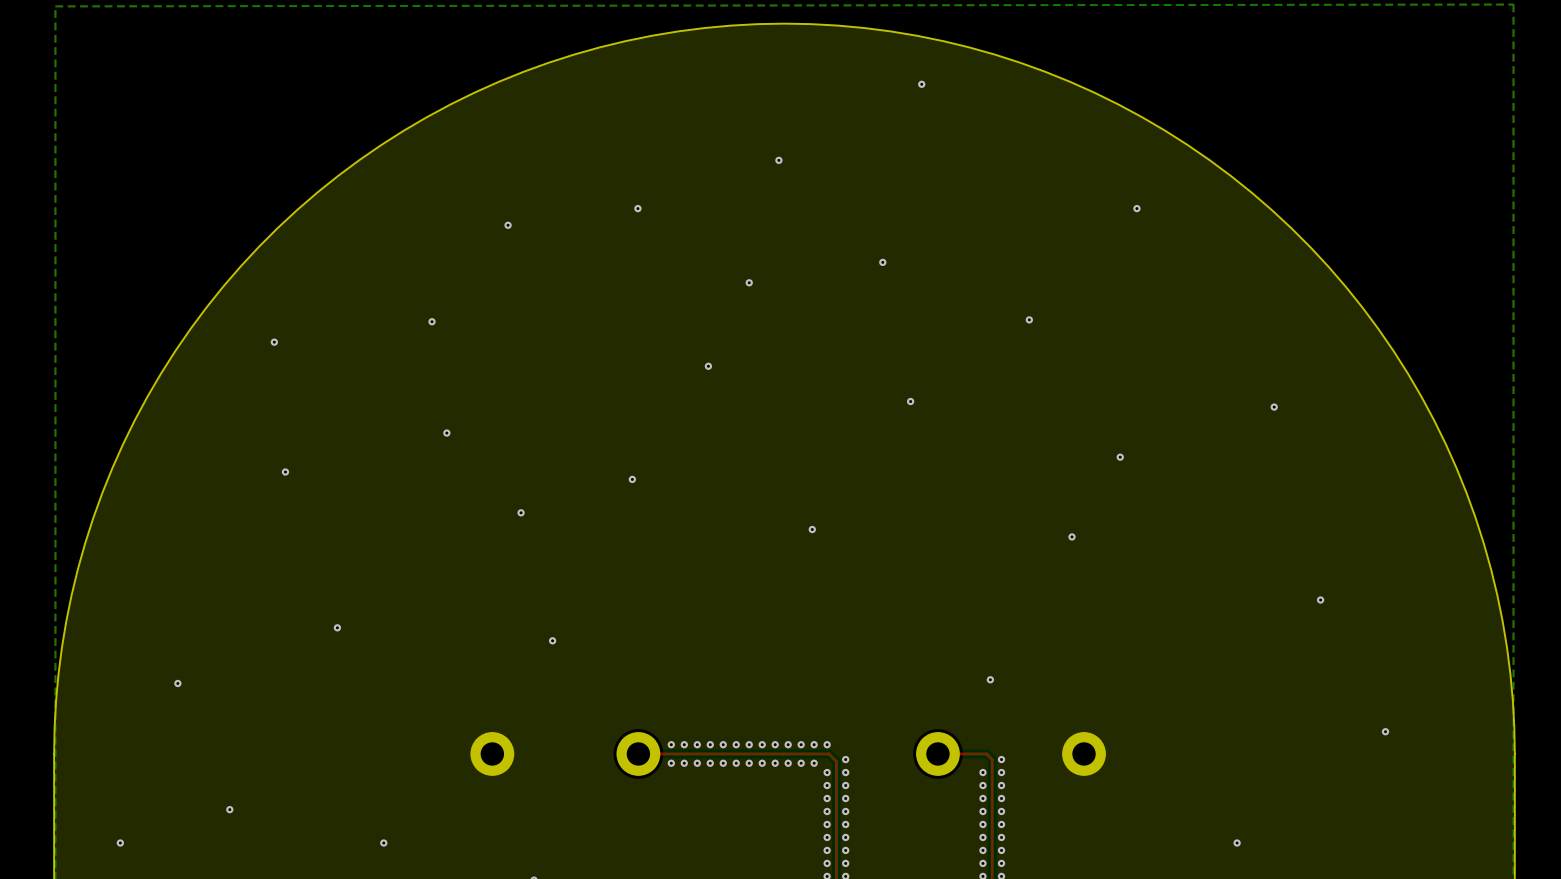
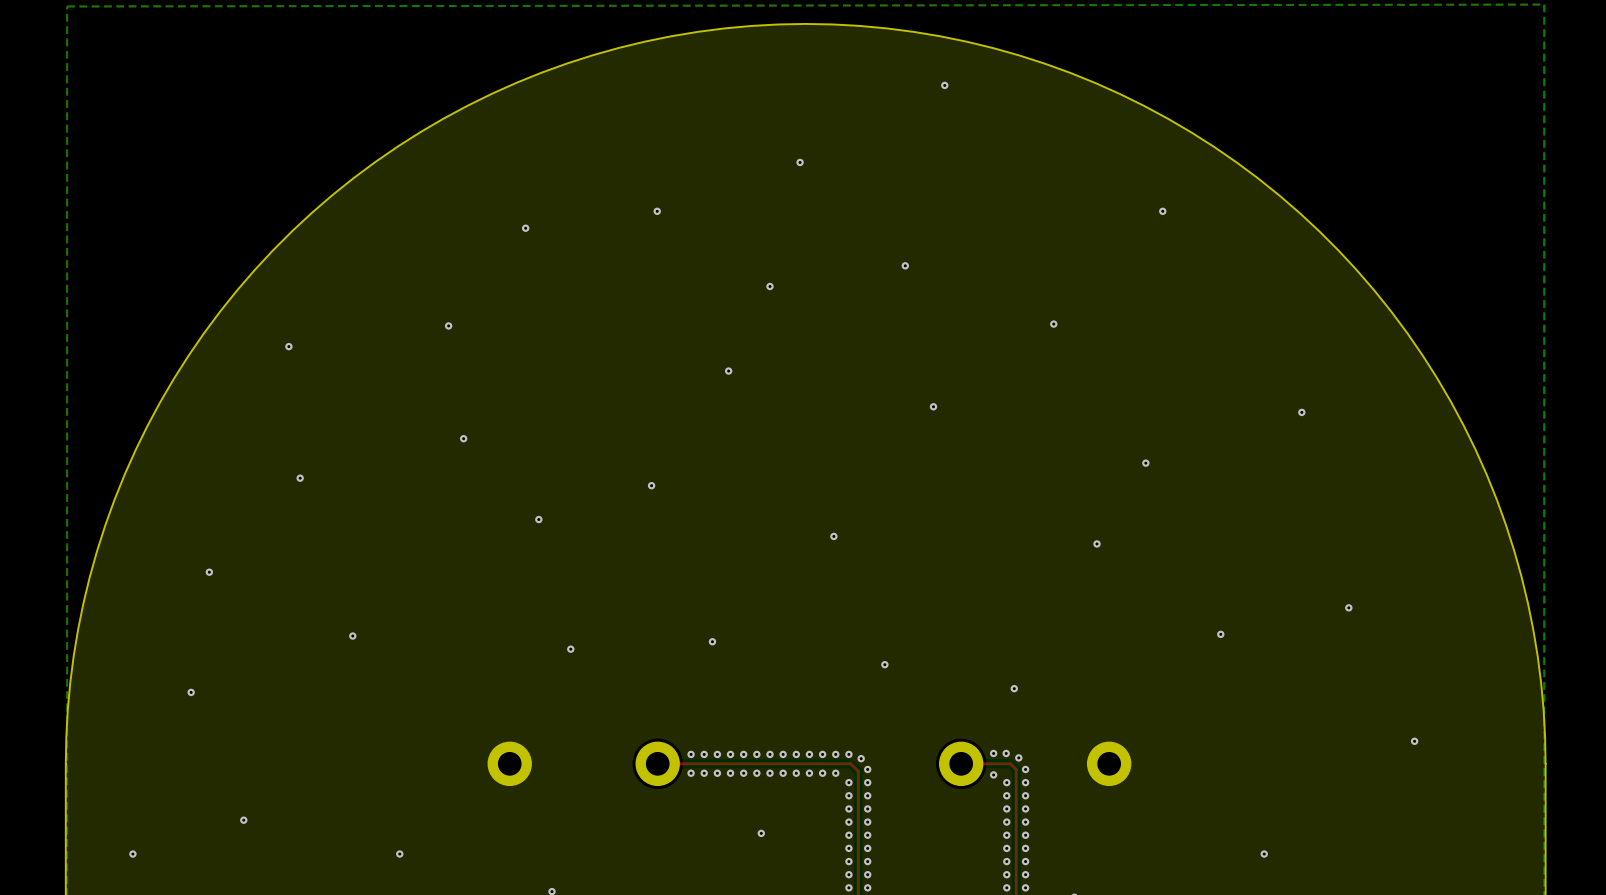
via: none -> (209, 572)
via: none -> (1220, 634)
via: none -> (712, 641)
via: none -> (884, 664)
via: none -> (993, 753)
via: none -> (1006, 753)
via: none -> (861, 758)
via: none -> (1018, 757)
via: none -> (993, 774)
via: none -> (761, 833)

